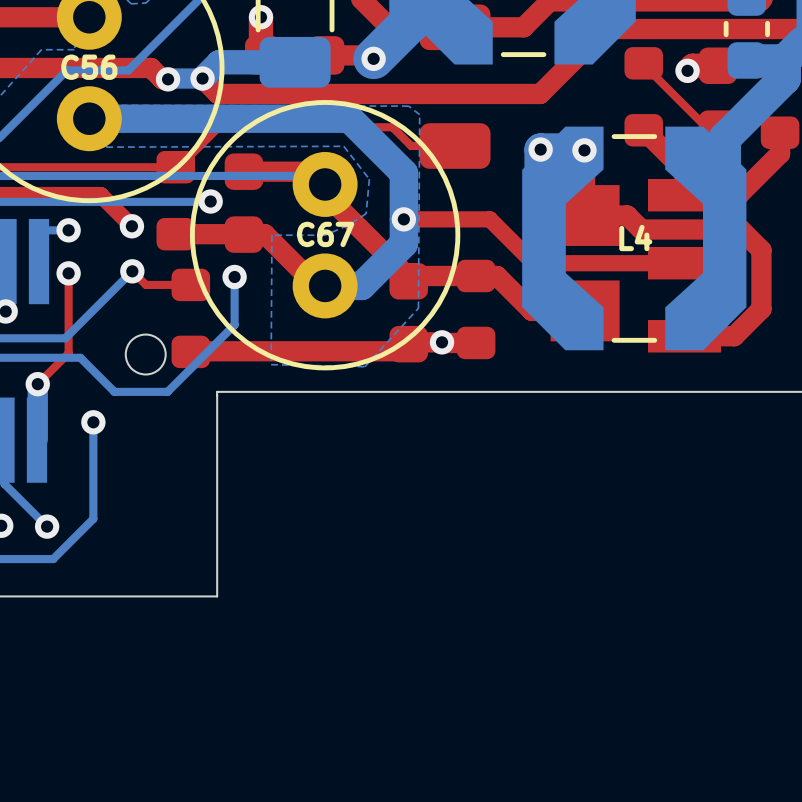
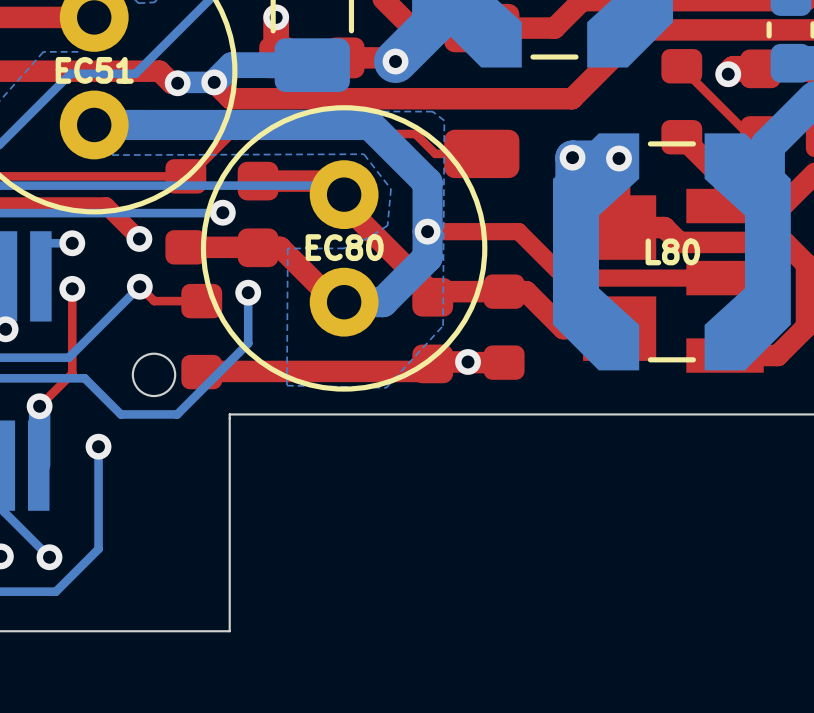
C56 name: C56 (89, 67) -> EC51 (94, 70)
C67 name: C67 (325, 234) -> EC80 (344, 247)
L4 name: L4 (635, 238) -> L80 (672, 251)

